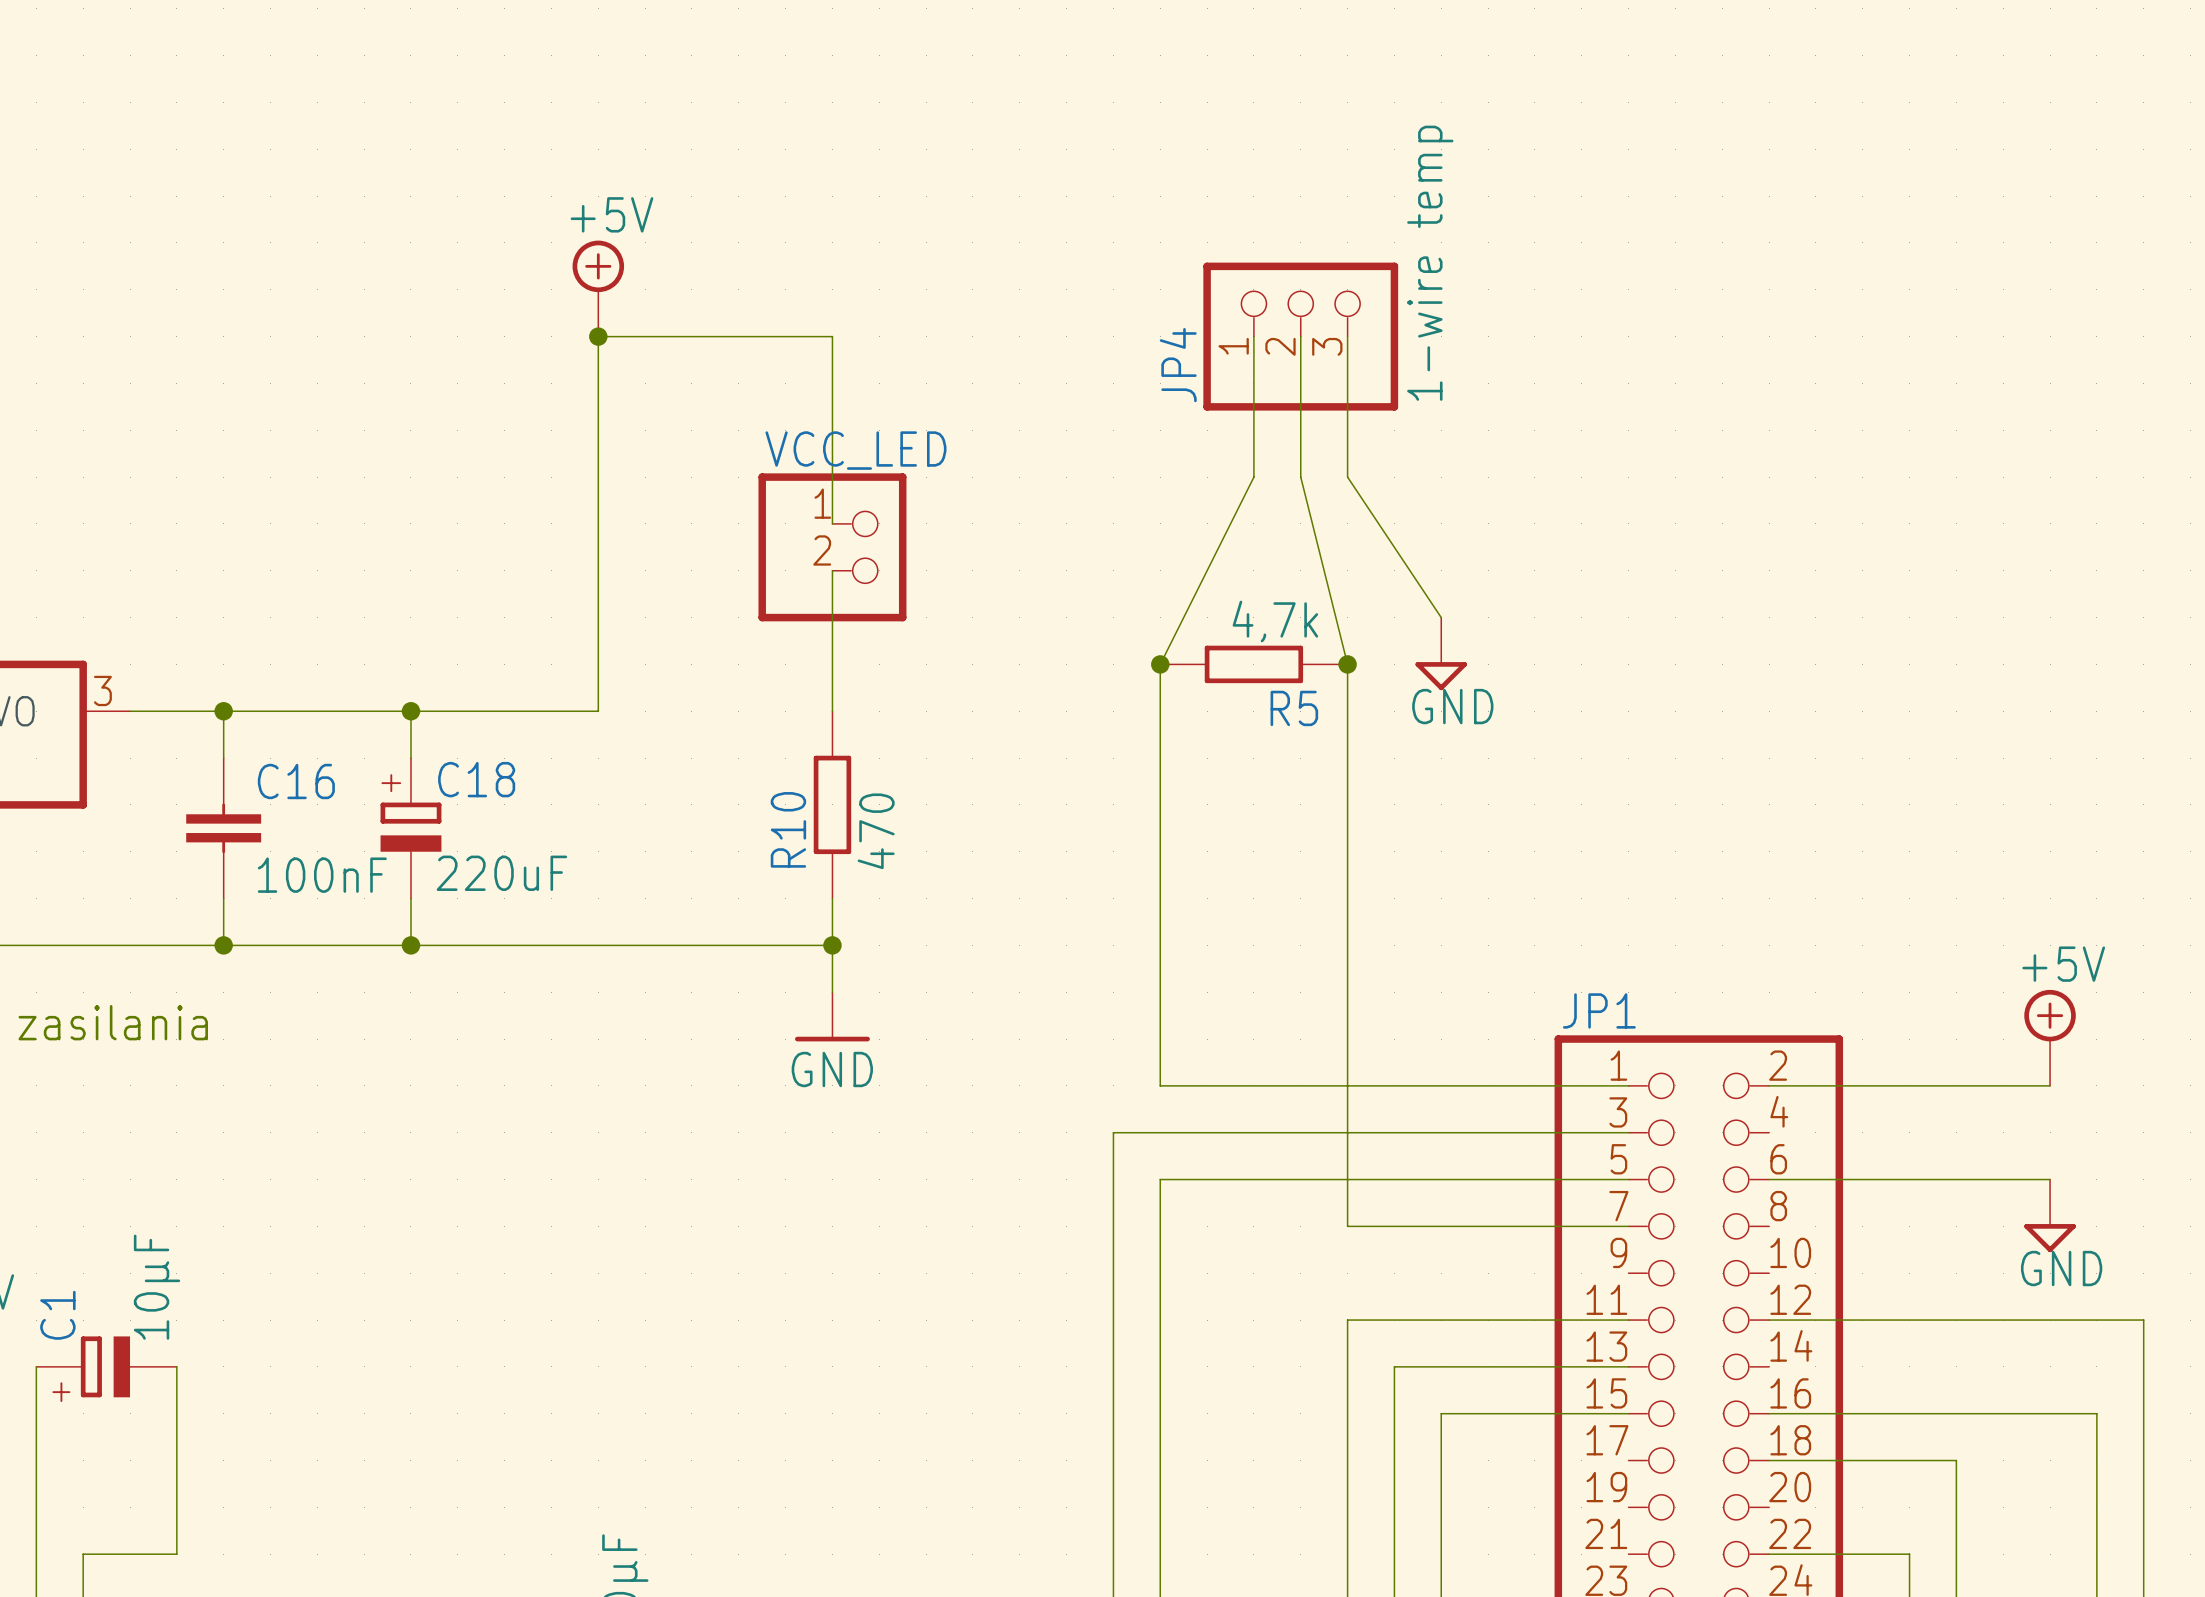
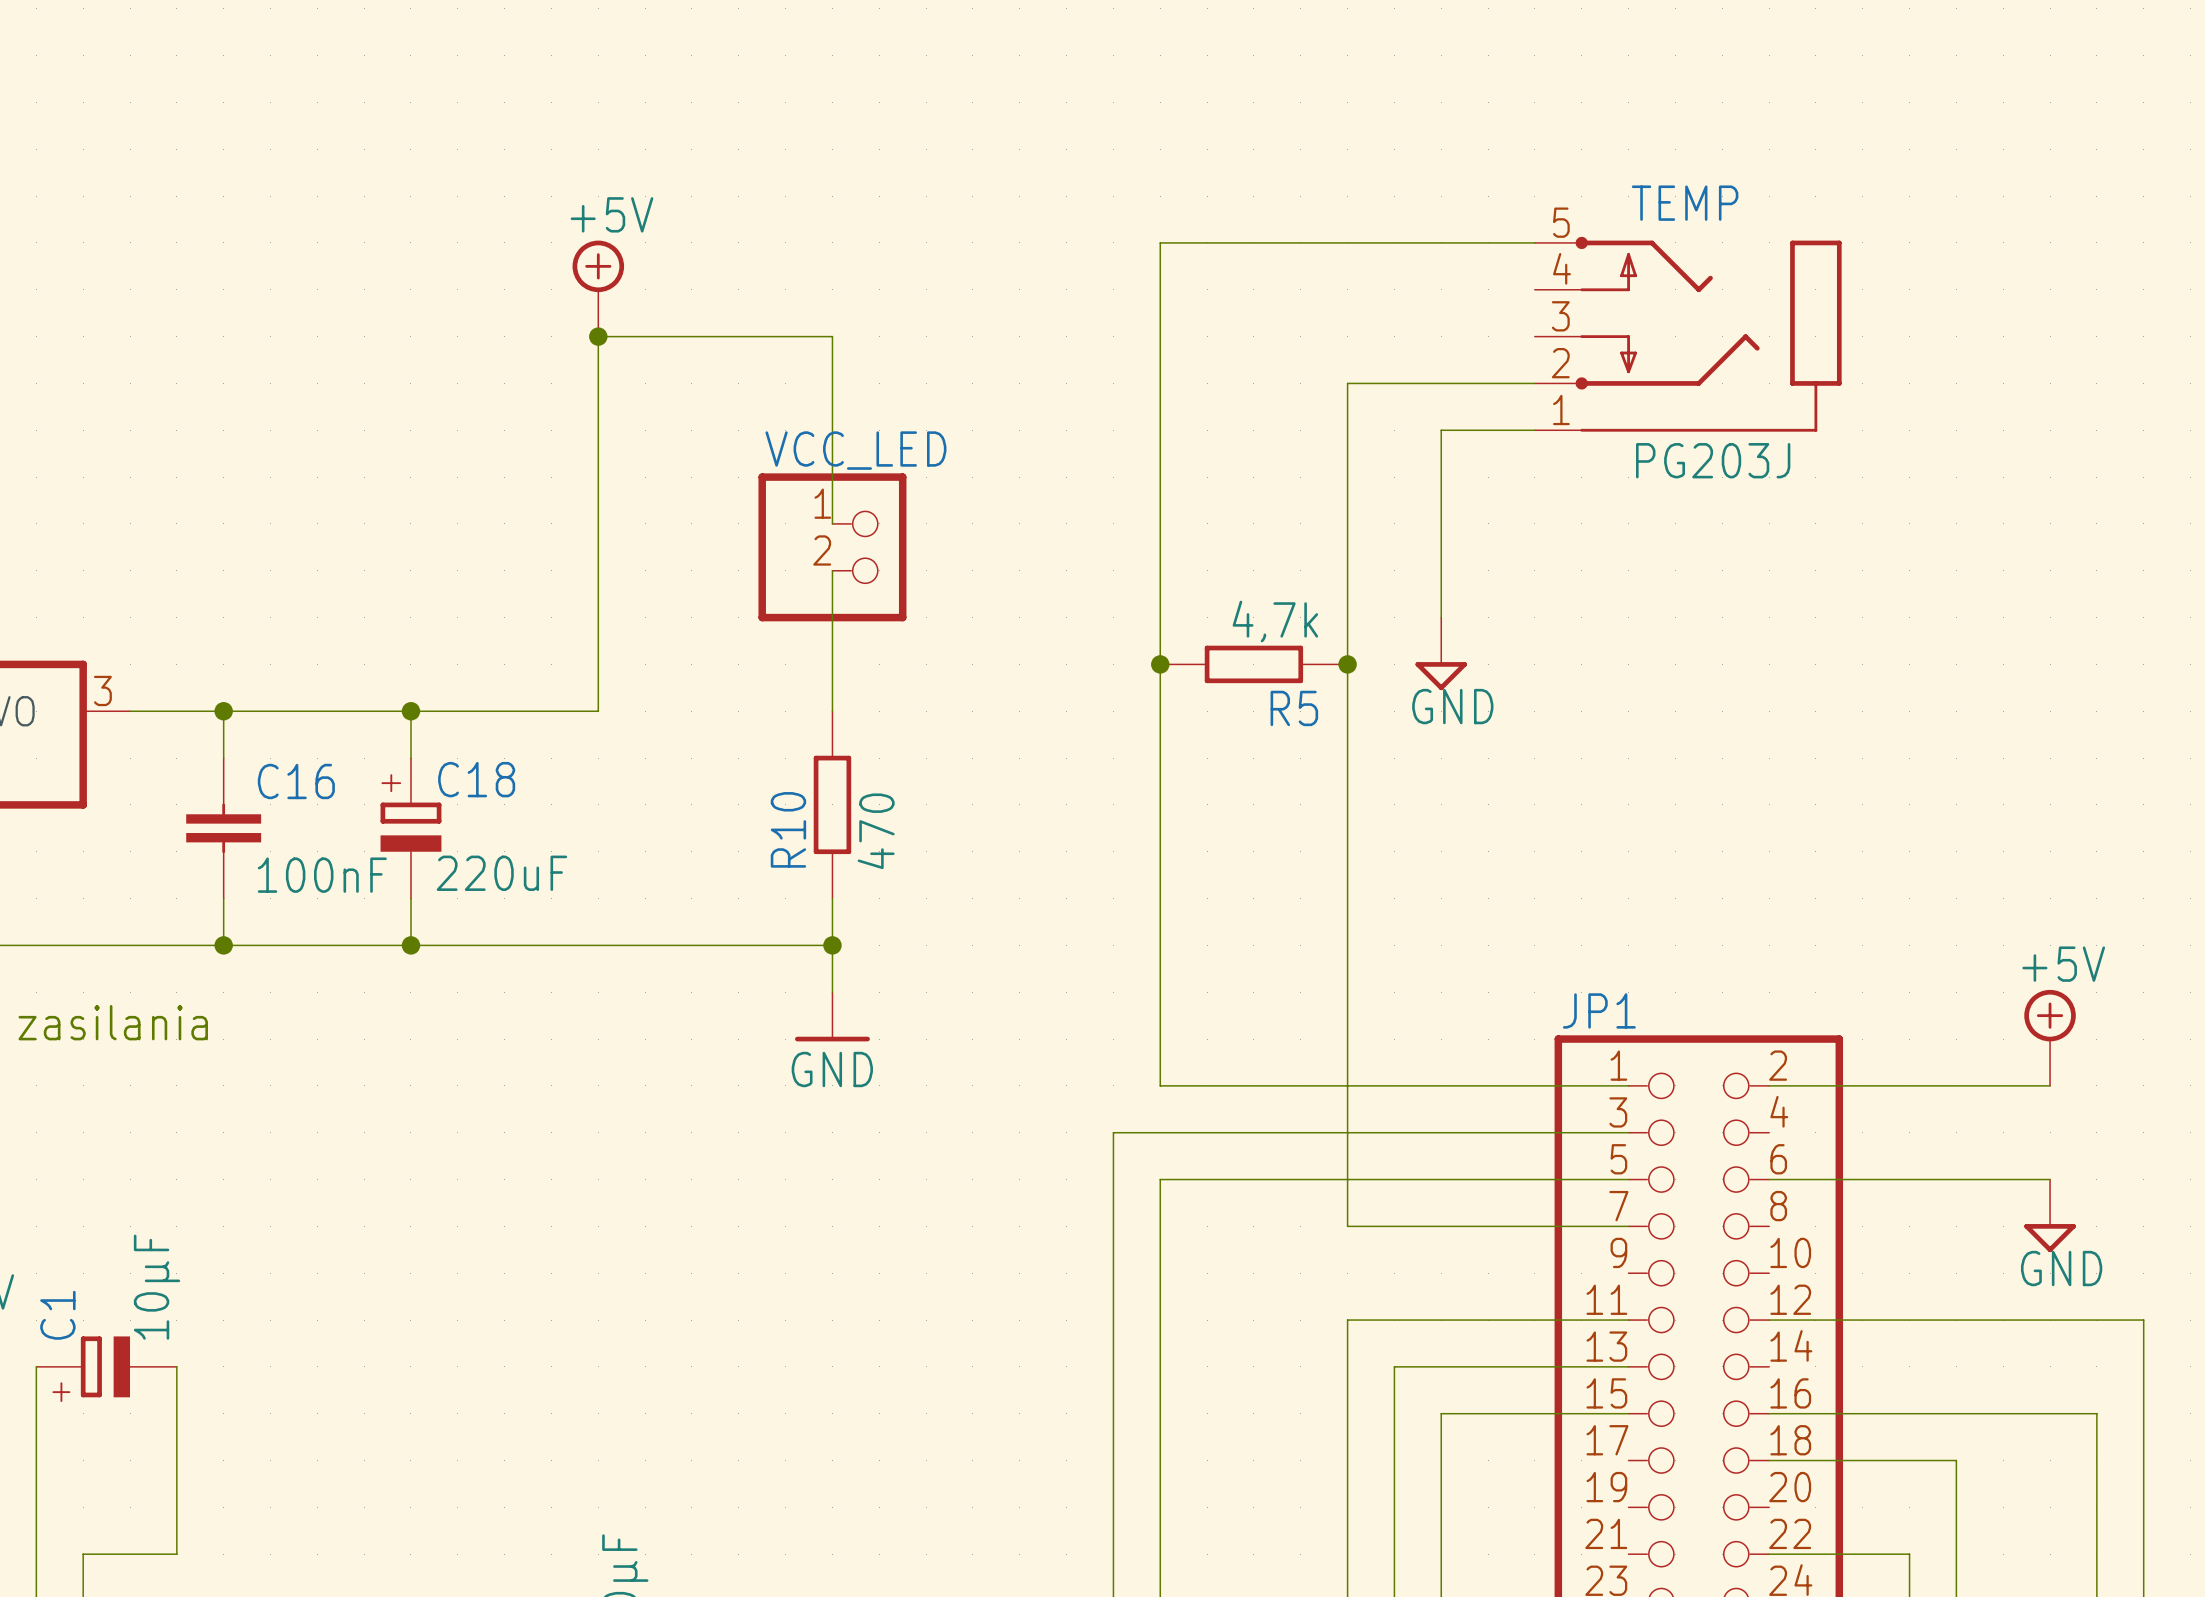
TEMP: none -> PG203J (1688, 334)
wire: (1253, 336) (1253, 477) (1160, 664) -> (1534, 242) (1160, 242) (1160, 664)
wire: (1300, 336) (1300, 477) (1347, 664) -> none
JP4: 1-wire temp (1300, 336) -> none
wire: (1347, 336) (1347, 383) -> (1534, 383) (1347, 383)
wire: none -> (1534, 430) (1441, 430) (1441, 617)
wire: (1347, 477) (1441, 617) -> (1347, 477) (1347, 664)

